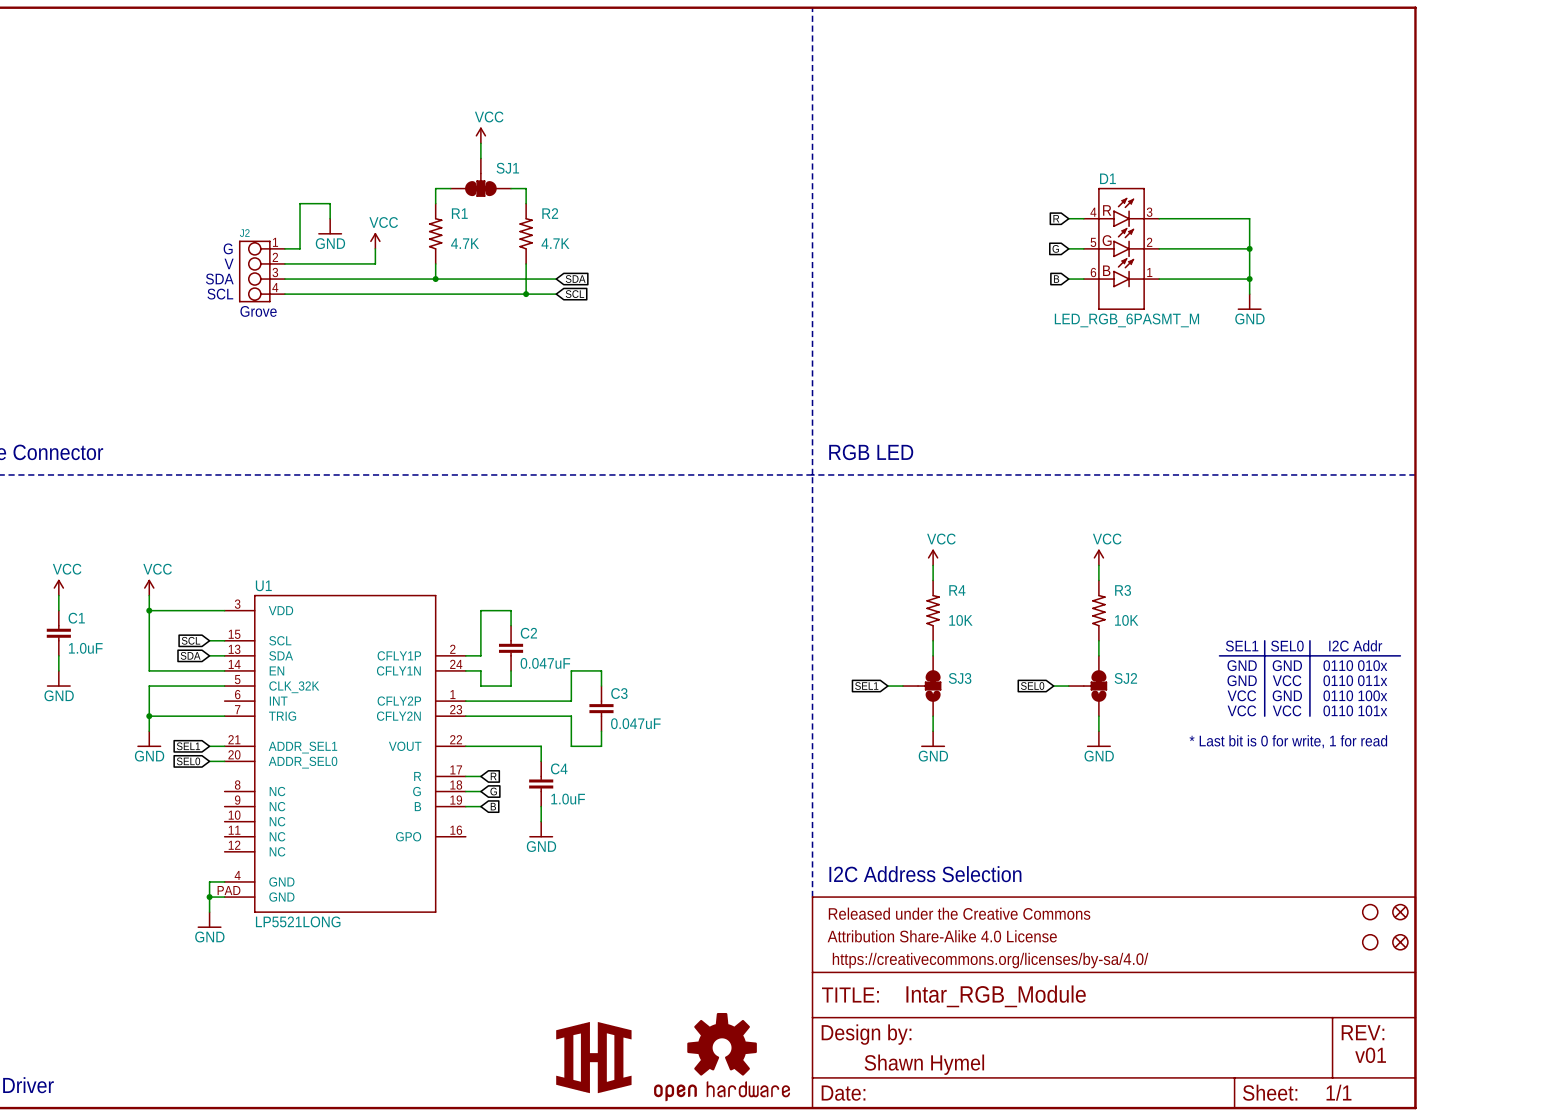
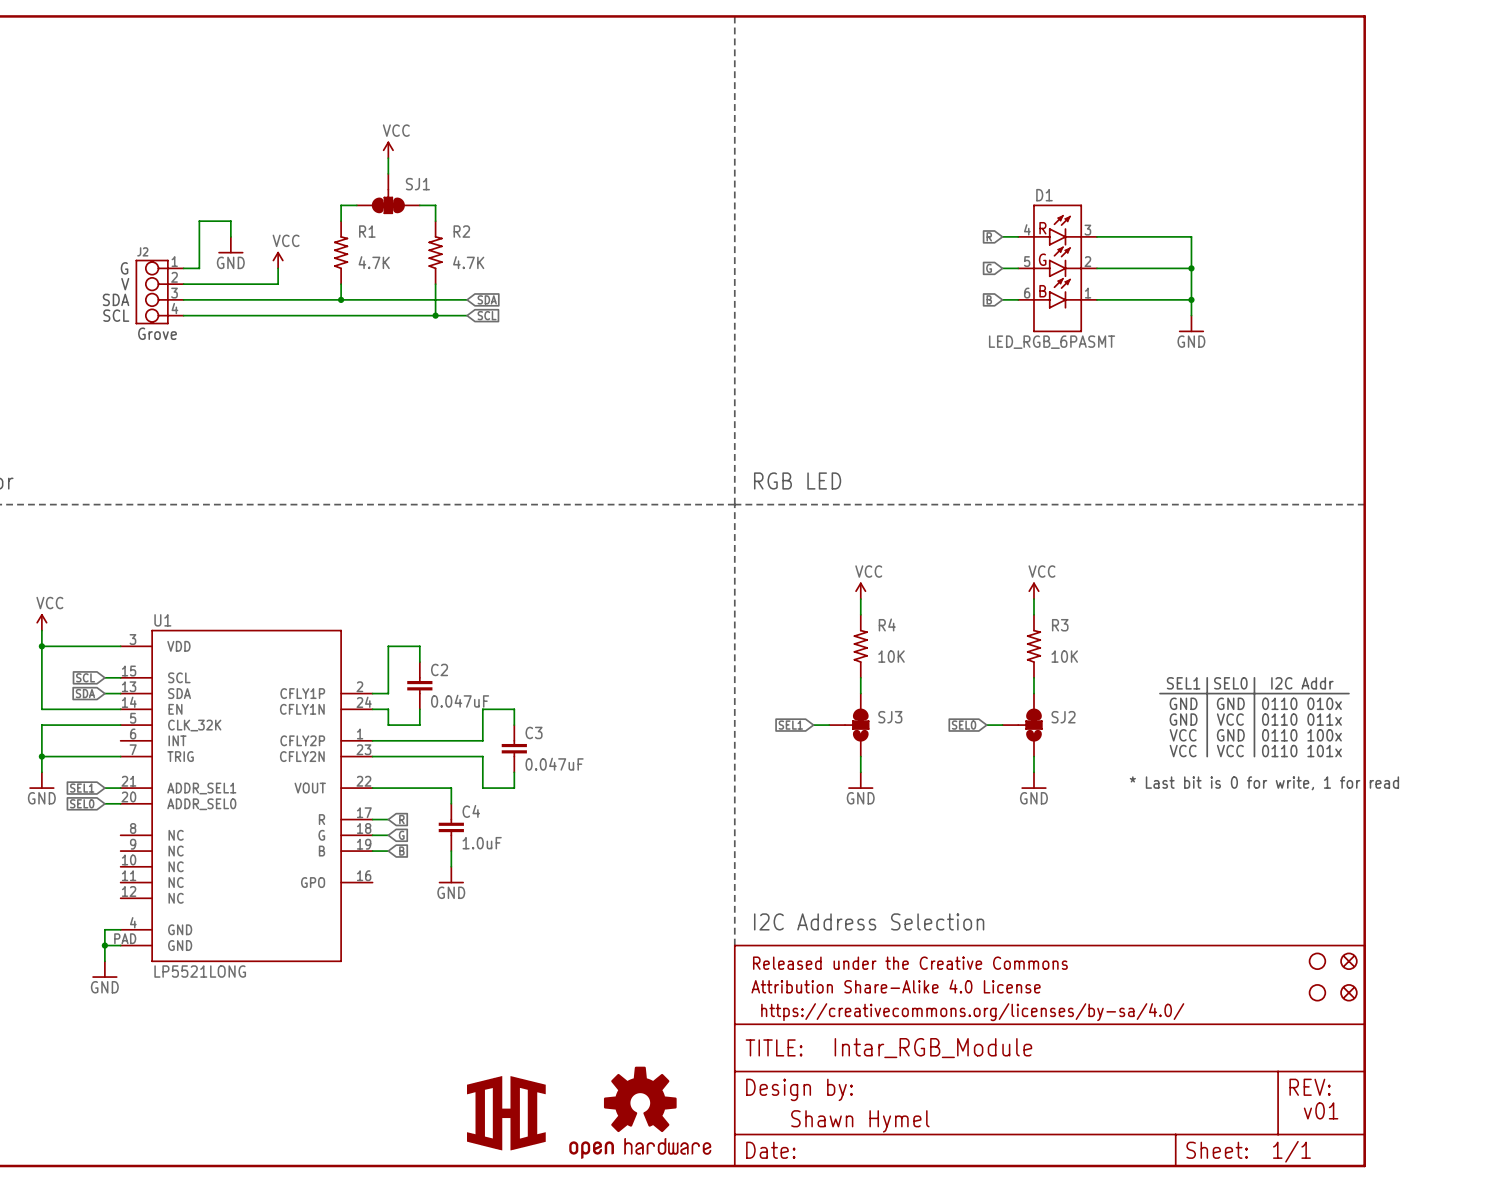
D1 value: LED_RGB_6PASMT_M (1126, 320) -> LED_RGB_6PASMT (1052, 342)

